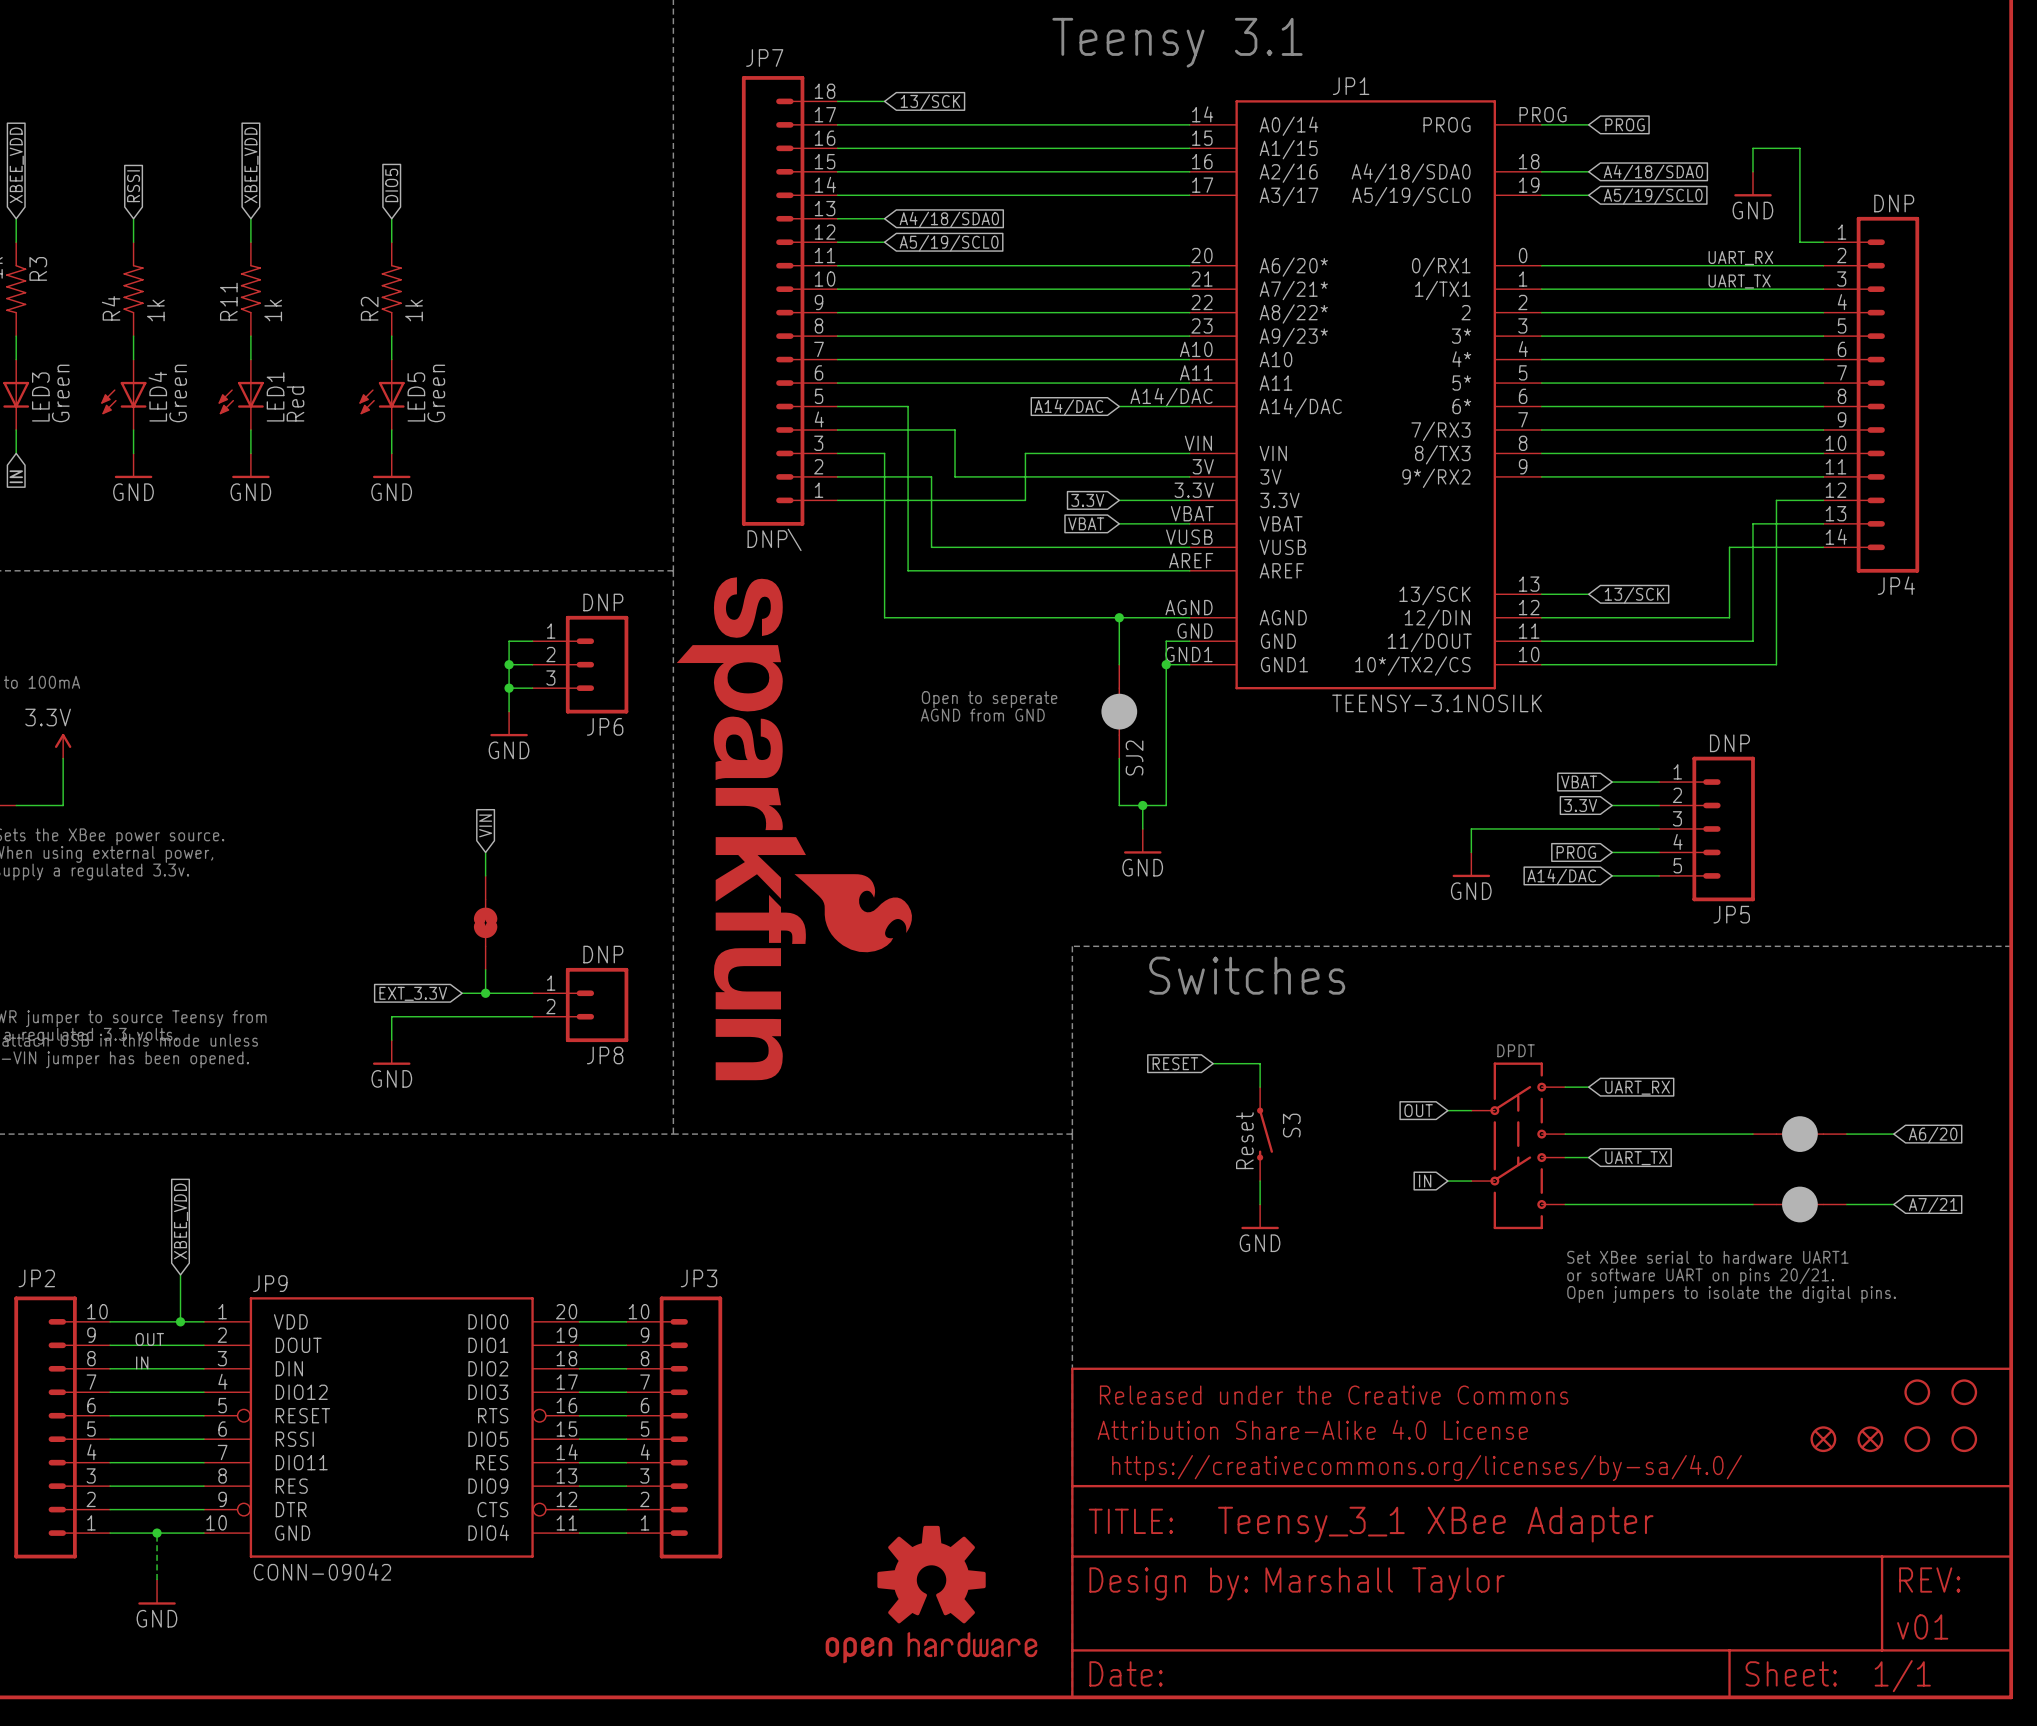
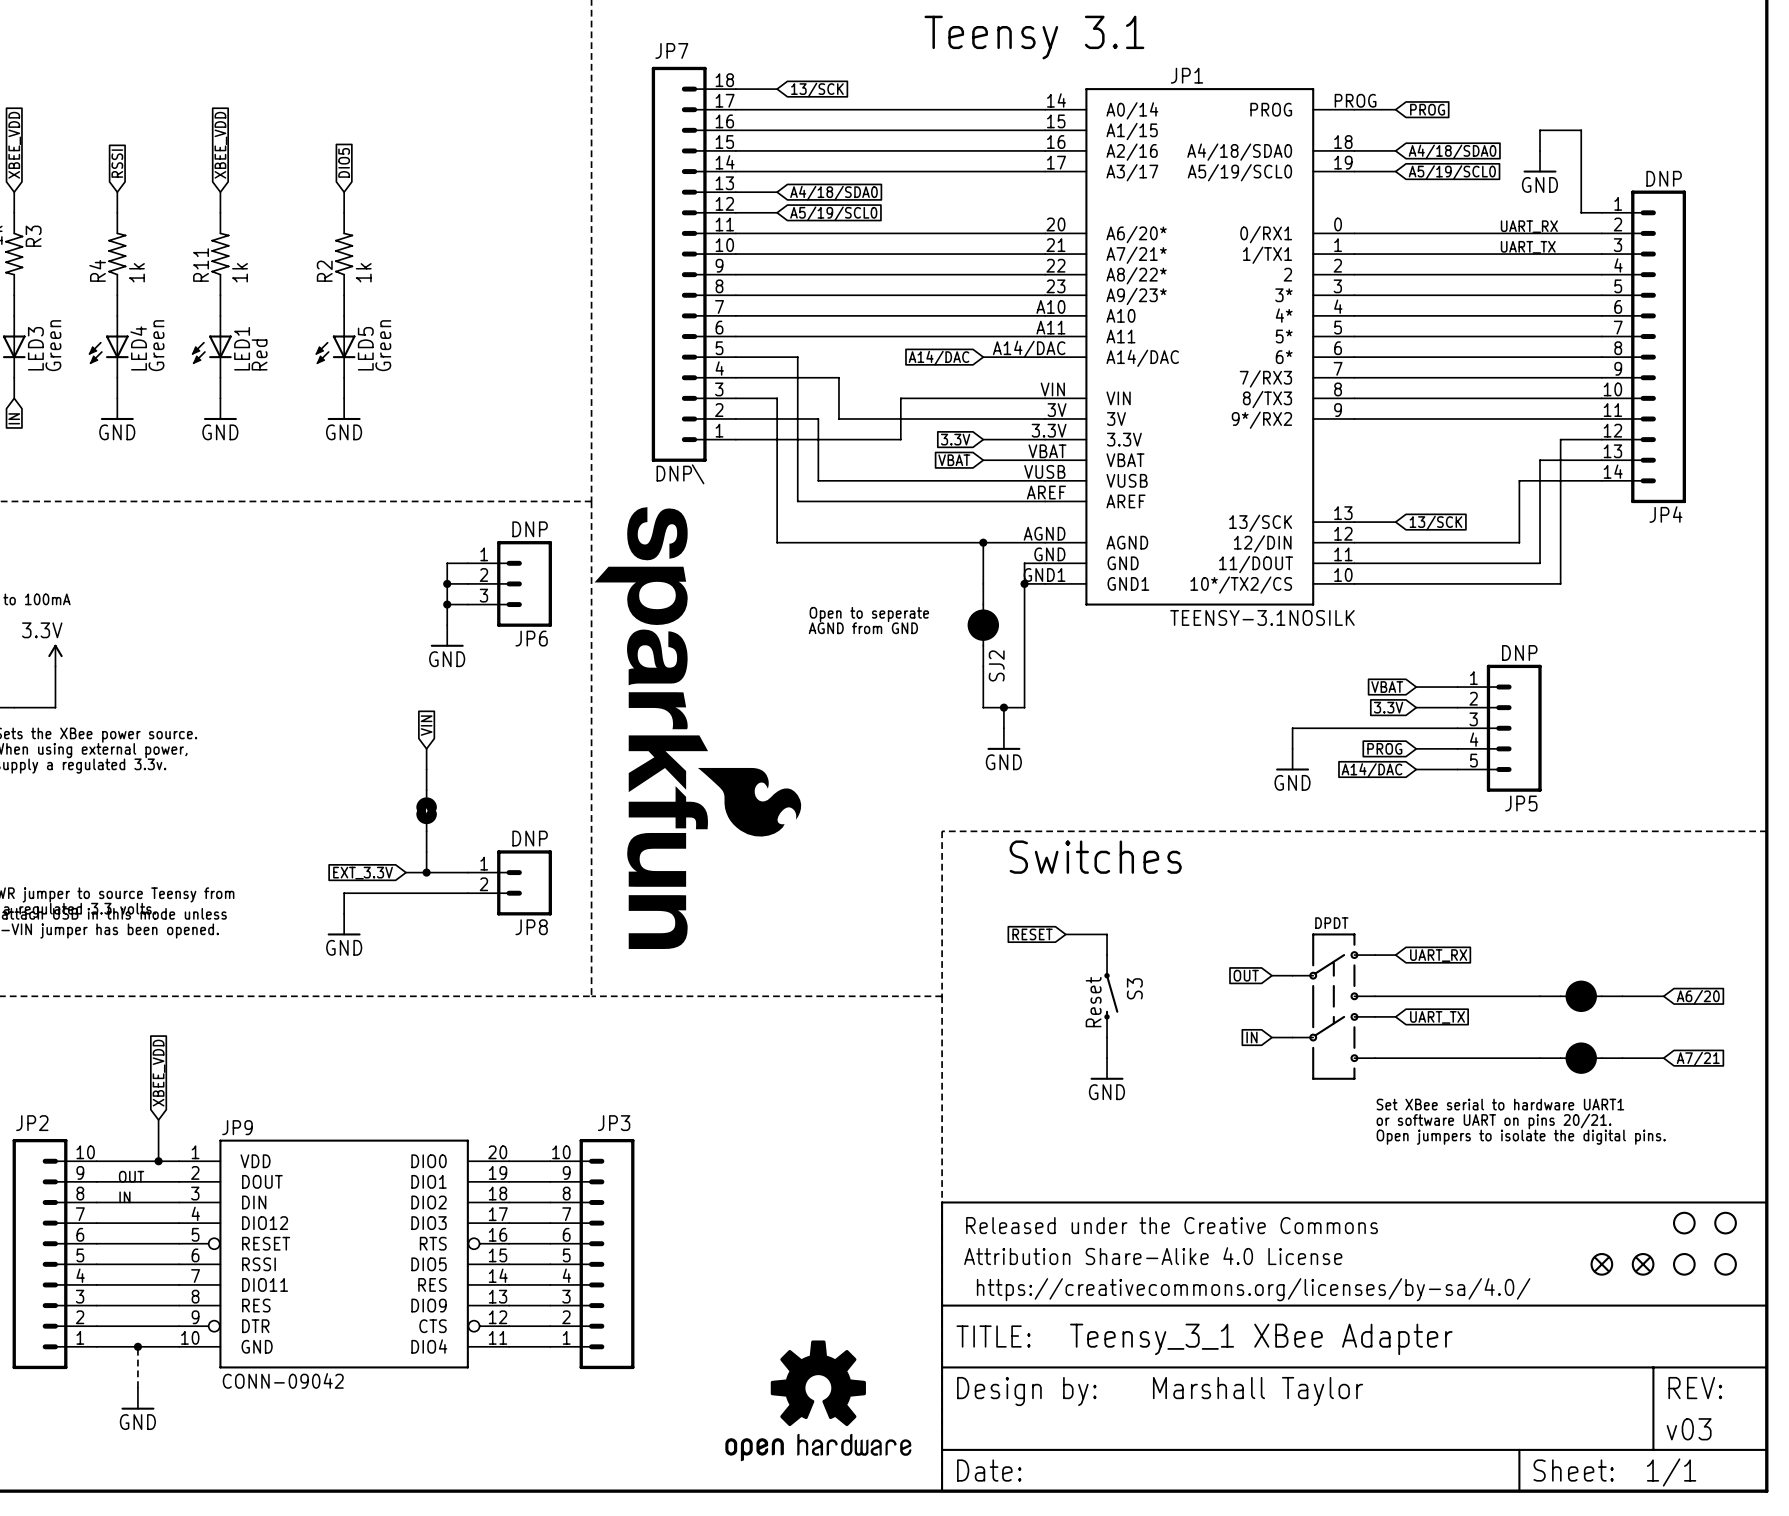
part text position: Marshall Taylor (1385, 1583) -> Marshall Taylor (1258, 1391)
part text: v01 (1922, 1626) -> v03 (1689, 1429)

